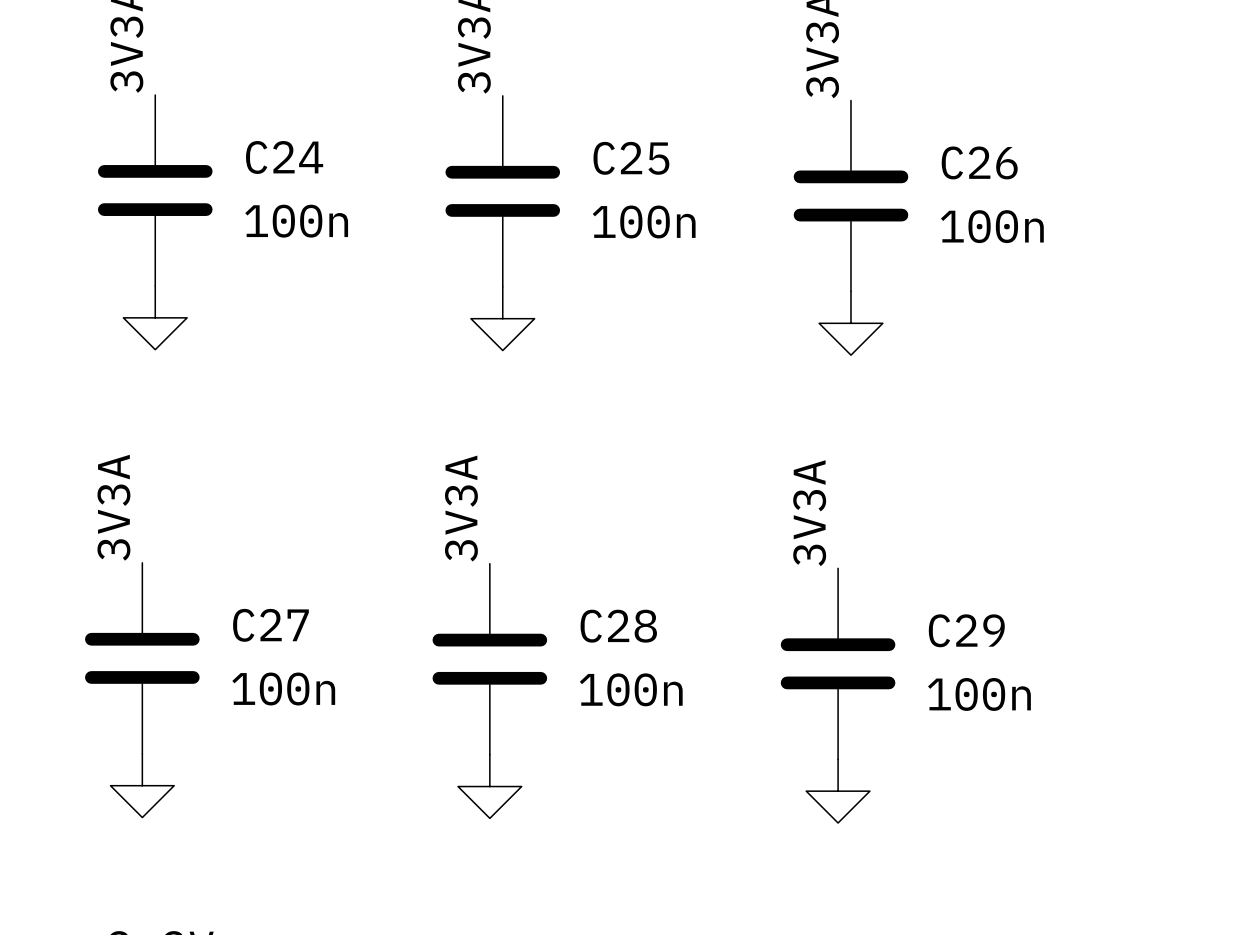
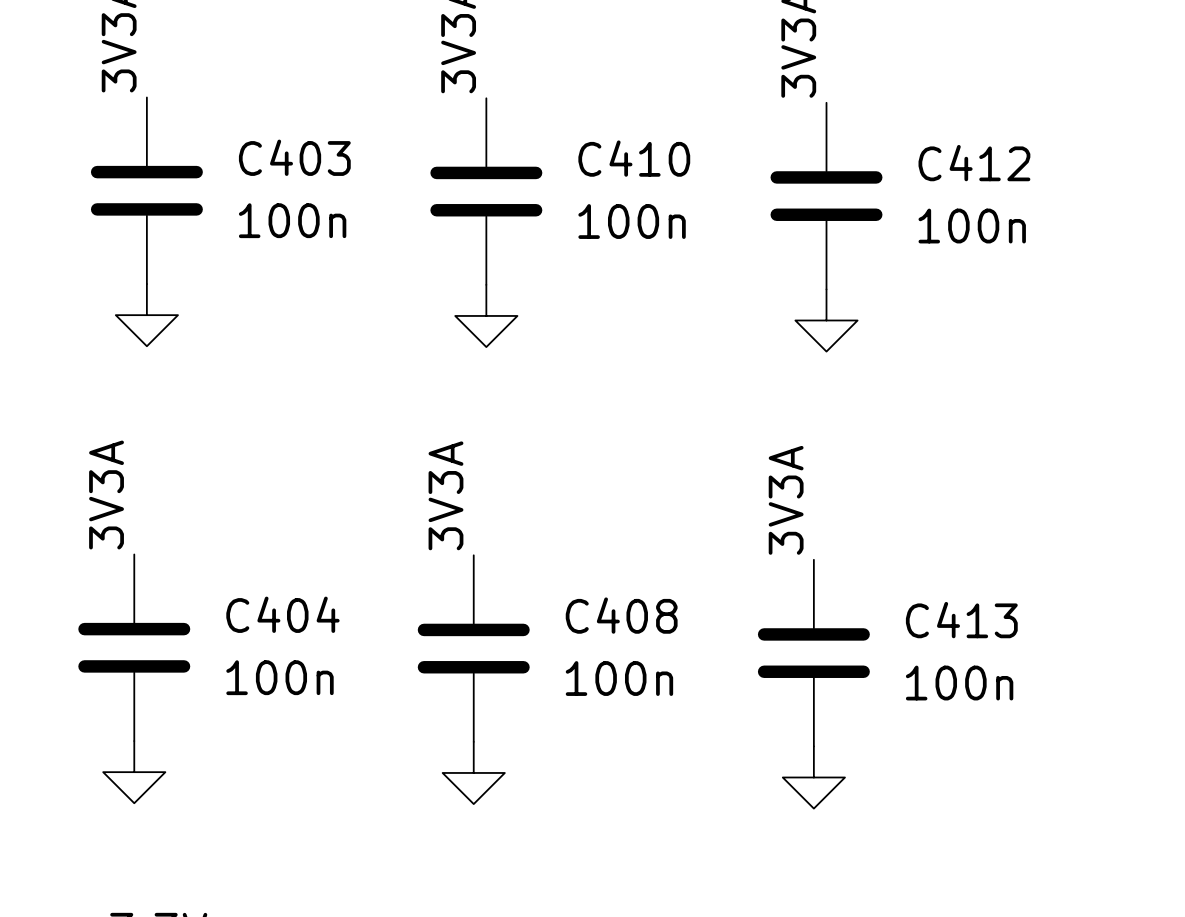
C24 name: C24 (284, 157) -> C403 (294, 157)
C25 name: C25 (631, 158) -> C410 (634, 158)
C26 name: C26 (979, 162) -> C412 (974, 163)
C27 name: C27 (270, 625) -> C404 (282, 614)
C28 name: C28 (618, 626) -> C408 (621, 615)
C29 name: C29 (966, 630) -> C413 (961, 620)

